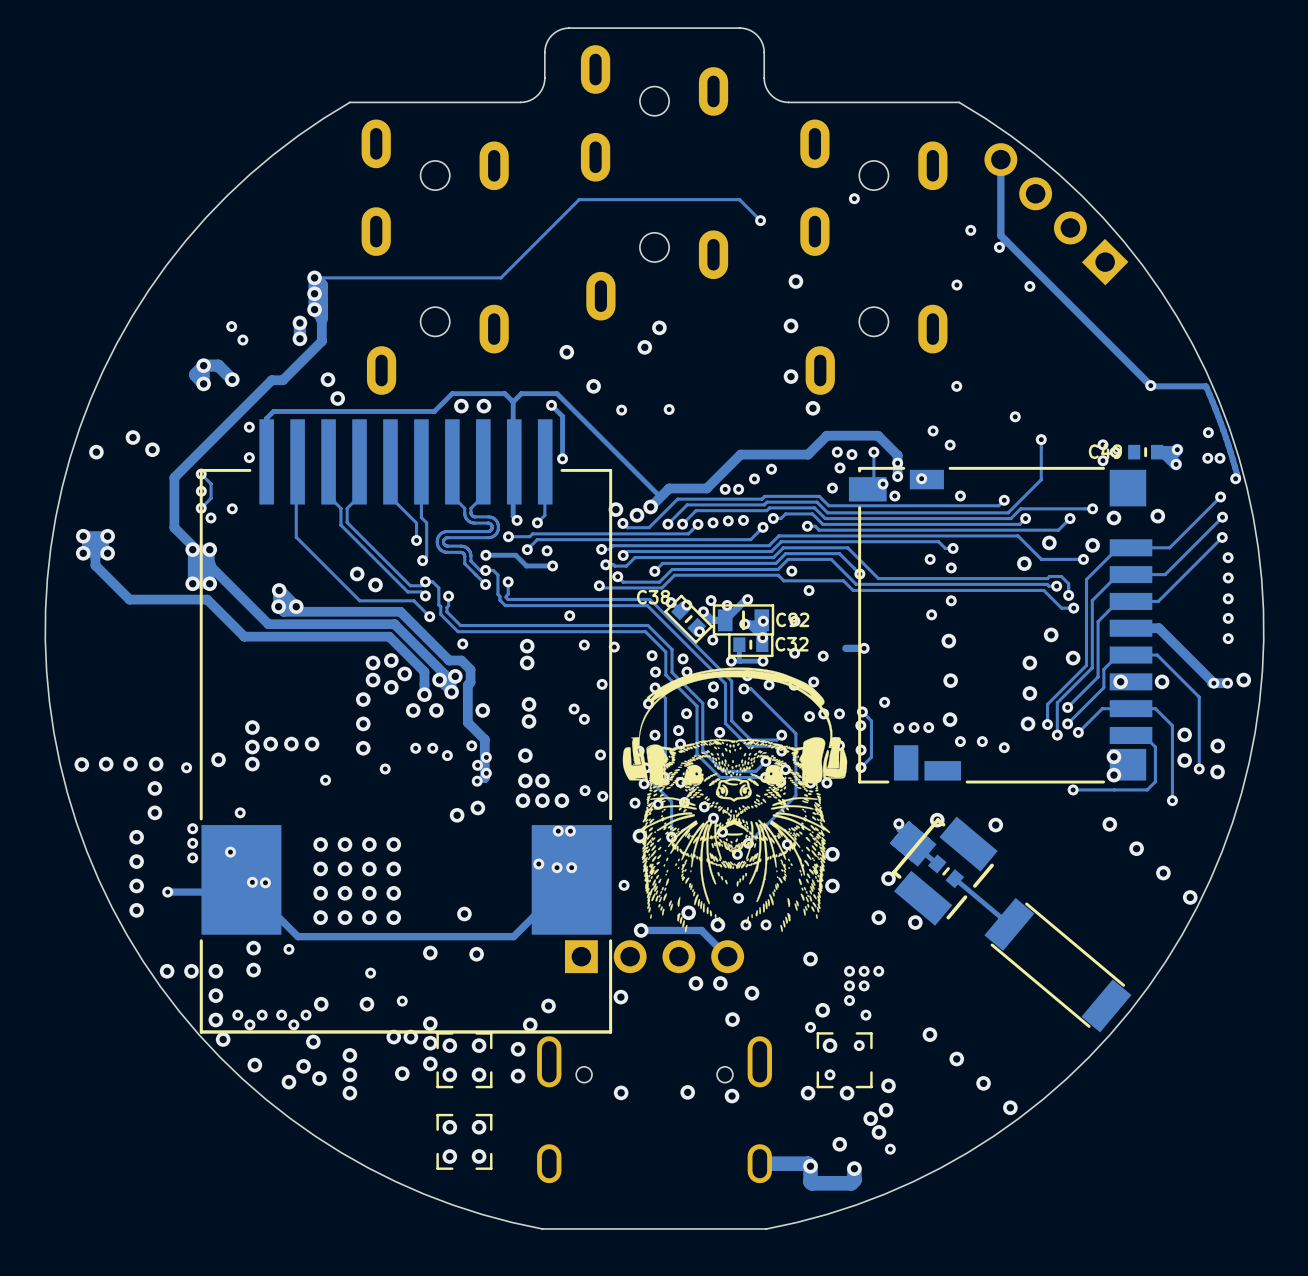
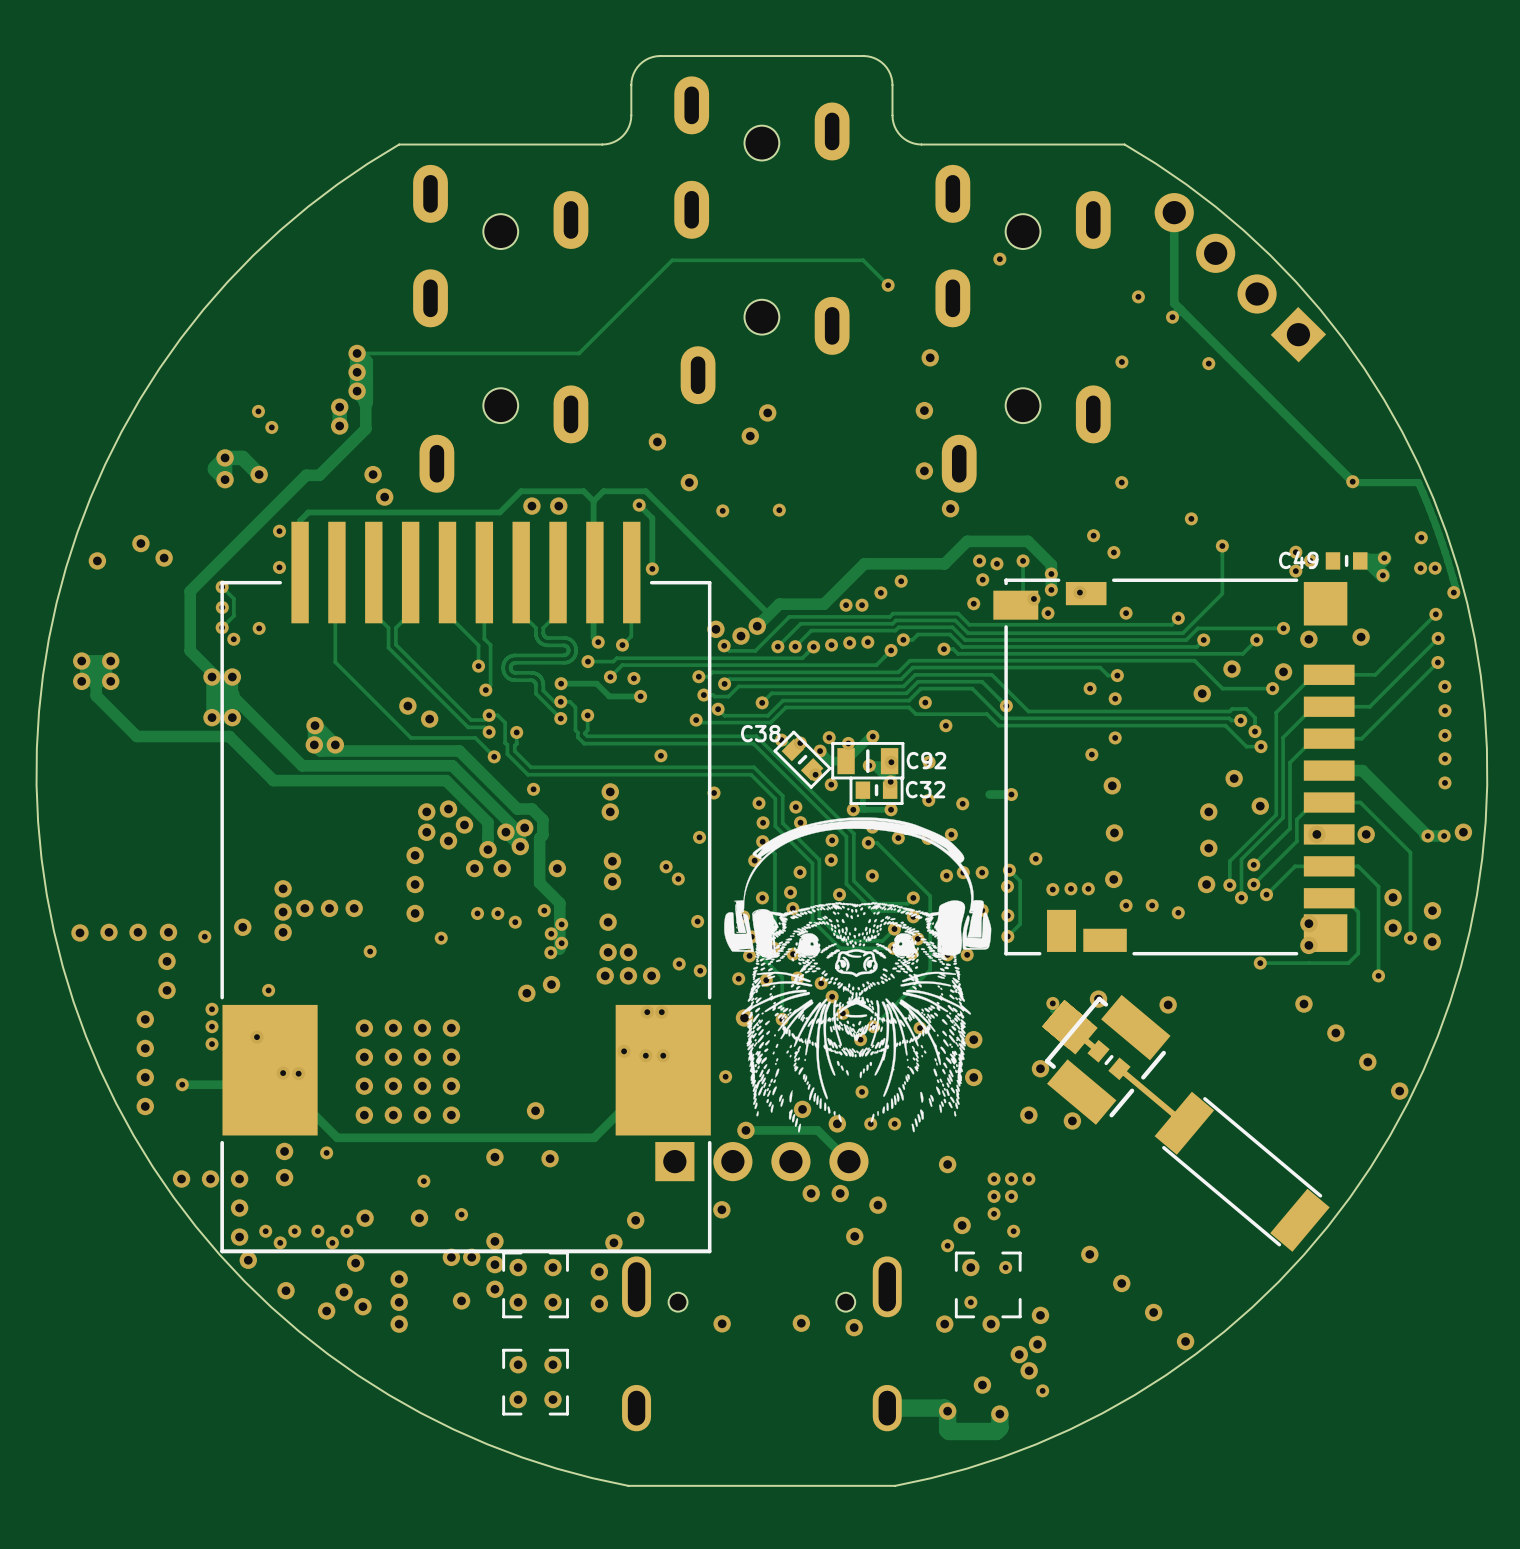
via: (584, 645) -> none

